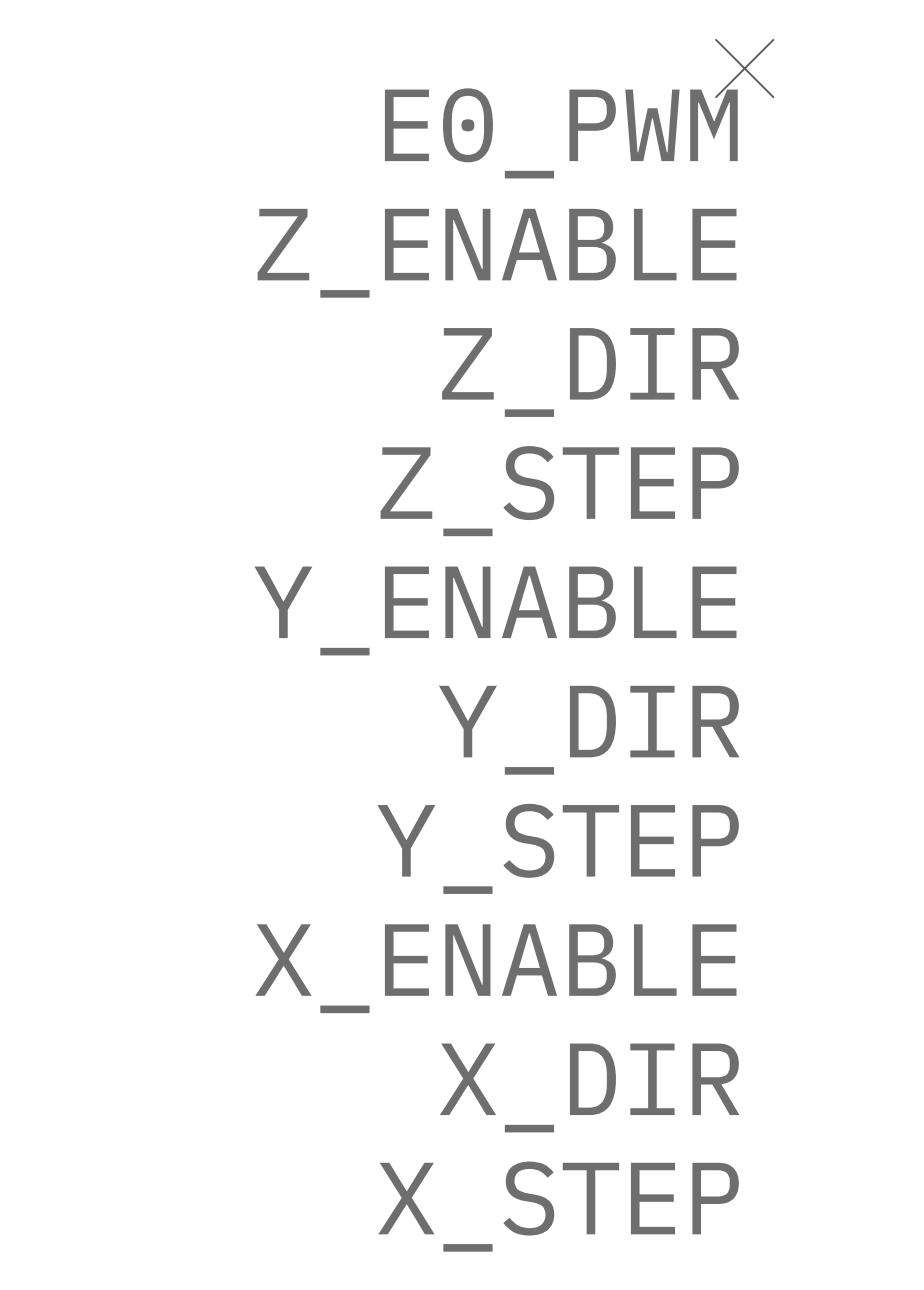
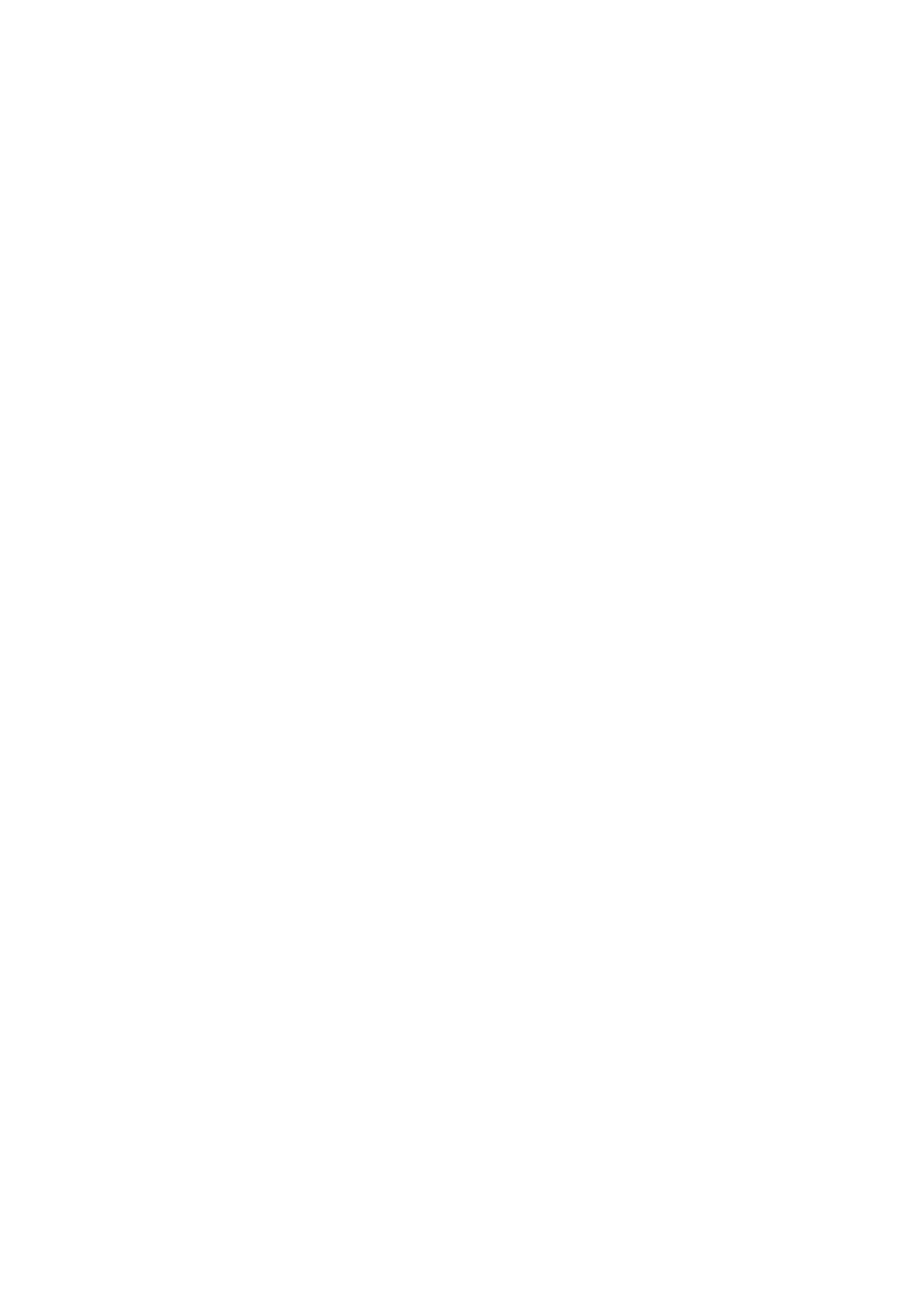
no-connect mark: (744, 68) -> none
label: E0_PWM (561, 133) -> none
label: Z_ENABLE (497, 253) -> none
label: Z_DIR (590, 372) -> none
label: Z_STEP (559, 491) -> none
label: Y_ENABLE (495, 610) -> none
label: Y_DIR (589, 730) -> none
label: Y_STEP (558, 848) -> none
label: X_ENABLE (495, 968) -> none
label: X_DIR (589, 1087) -> none
label: X_STEP (558, 1206) -> none

